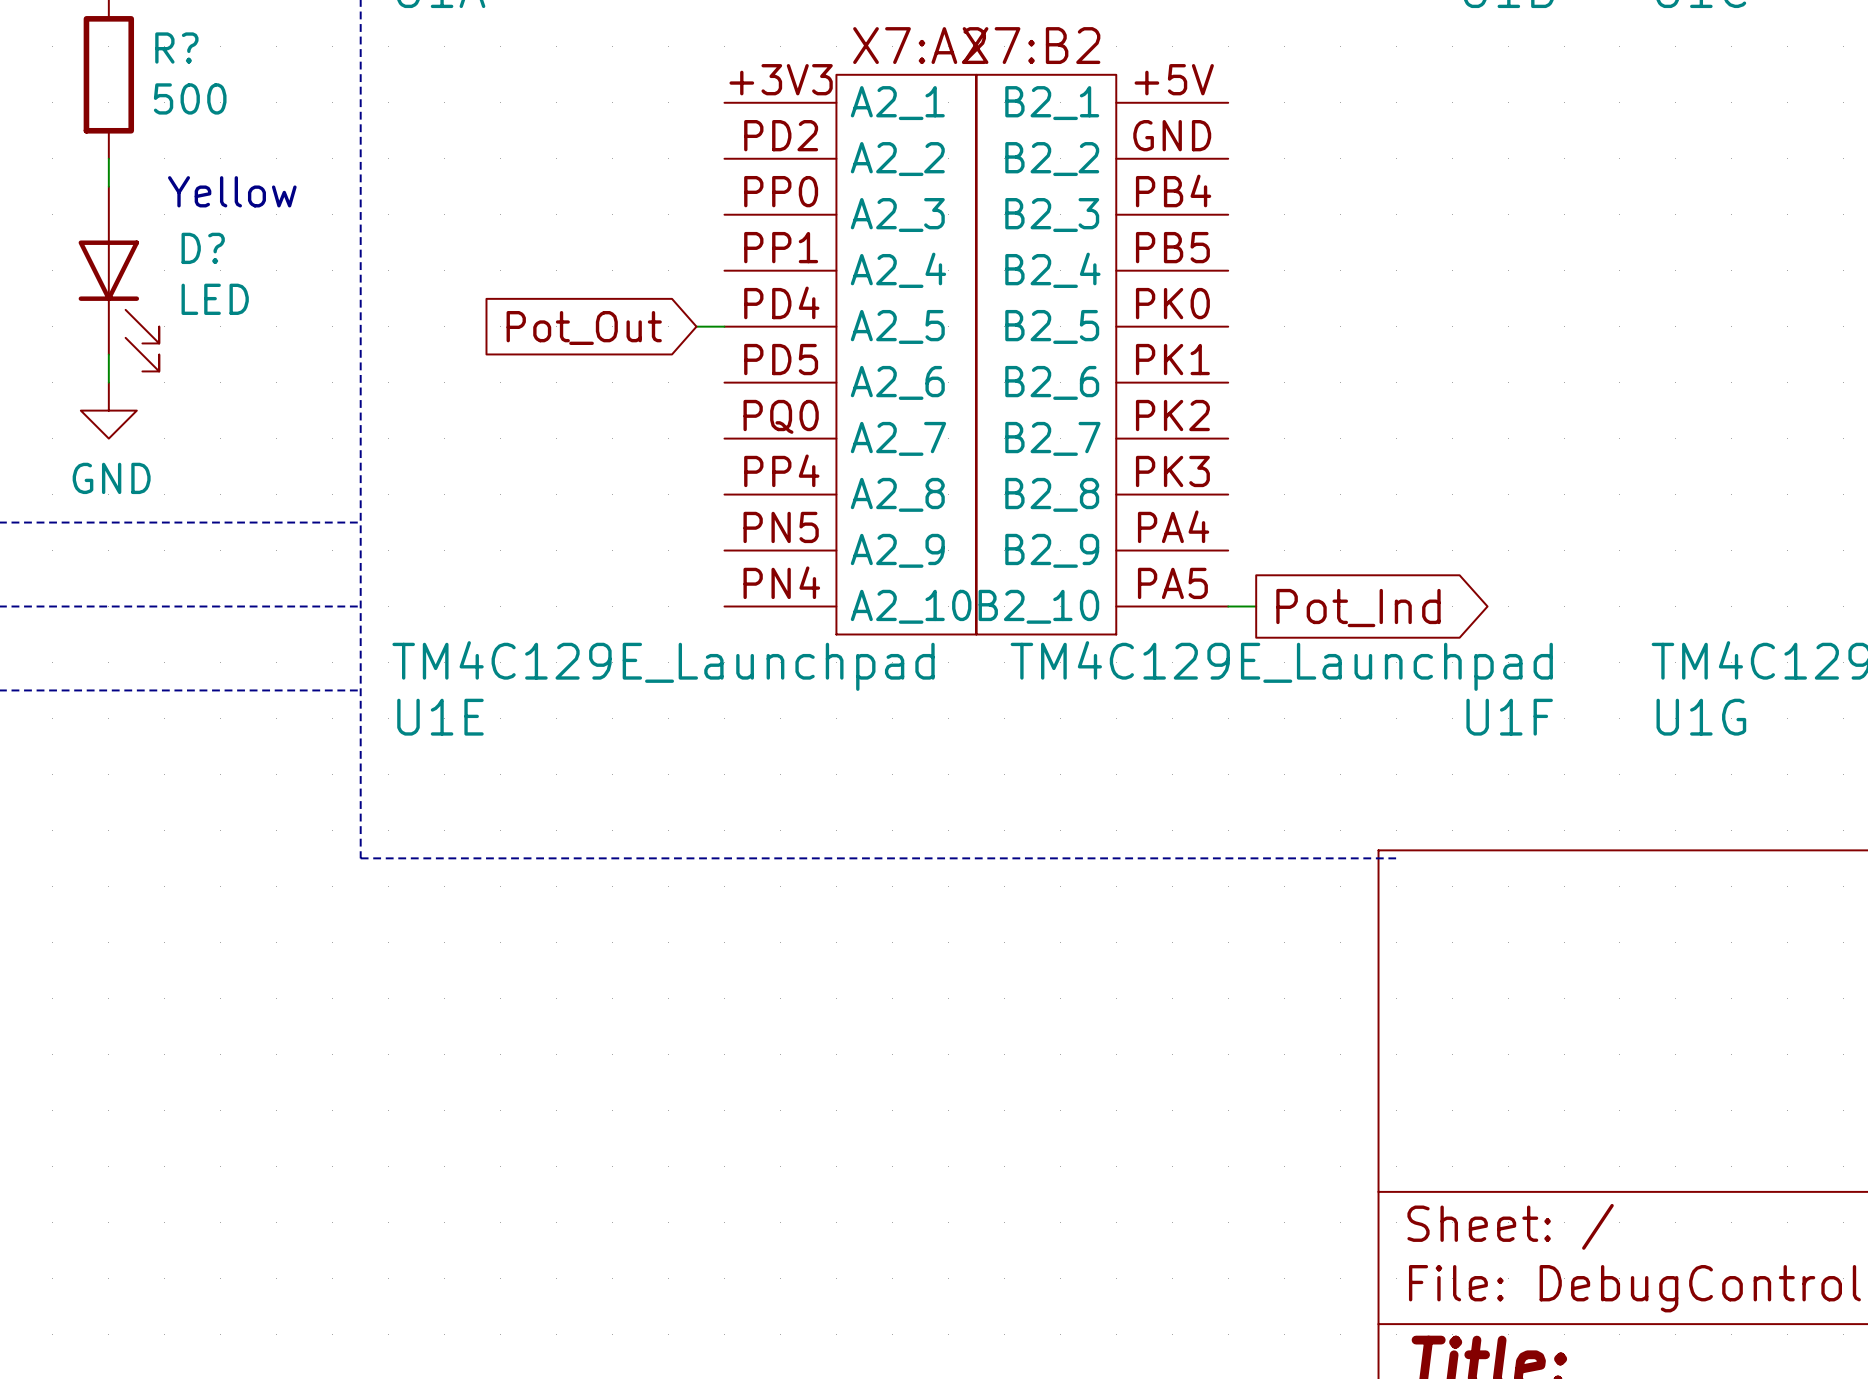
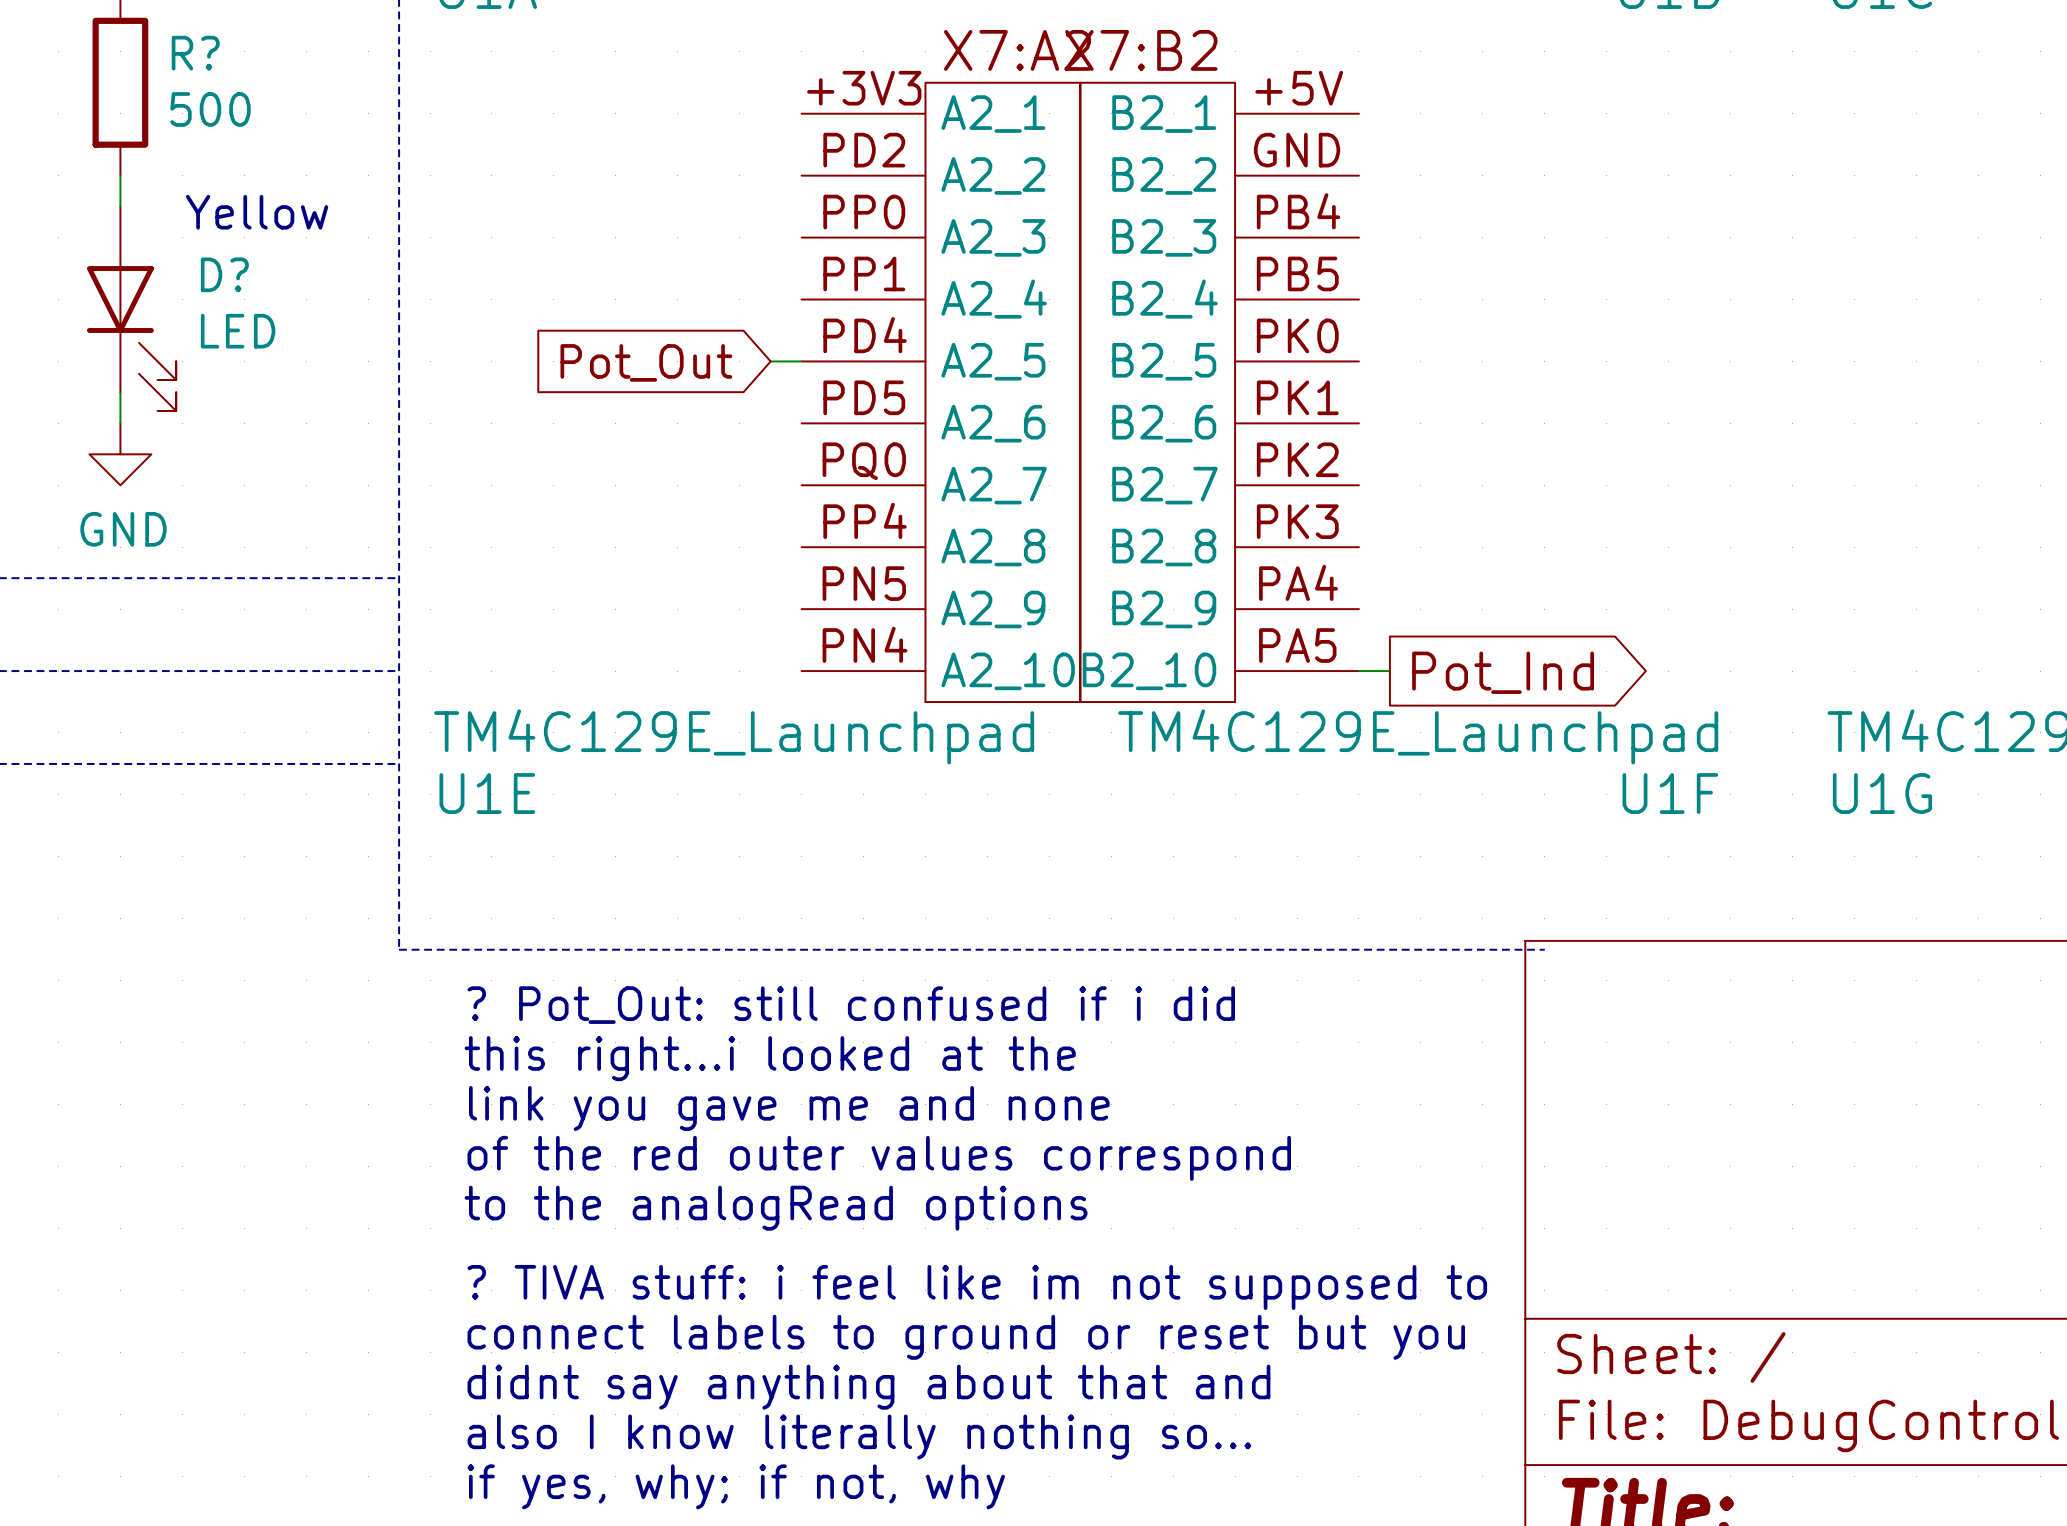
text: none -> ? Pot_Out: still confused if i did (851, 1005)
text: none -> this right...i looked at the (770, 1058)
text: none -> link you gave me and none (789, 1108)
text: none -> of the red outer values correspond (879, 1158)
text: none -> to the analogRead options (776, 1208)
text: none -> ? TIVA stuff: i feel like im not supposed to (977, 1287)
text: none -> connect labels to ground or reset but you (966, 1337)
text: none -> didnt say anything about that and (868, 1387)
text: none -> also I know literally nothing so... (859, 1437)
text: none -> if yes, why; if not, why (736, 1486)

